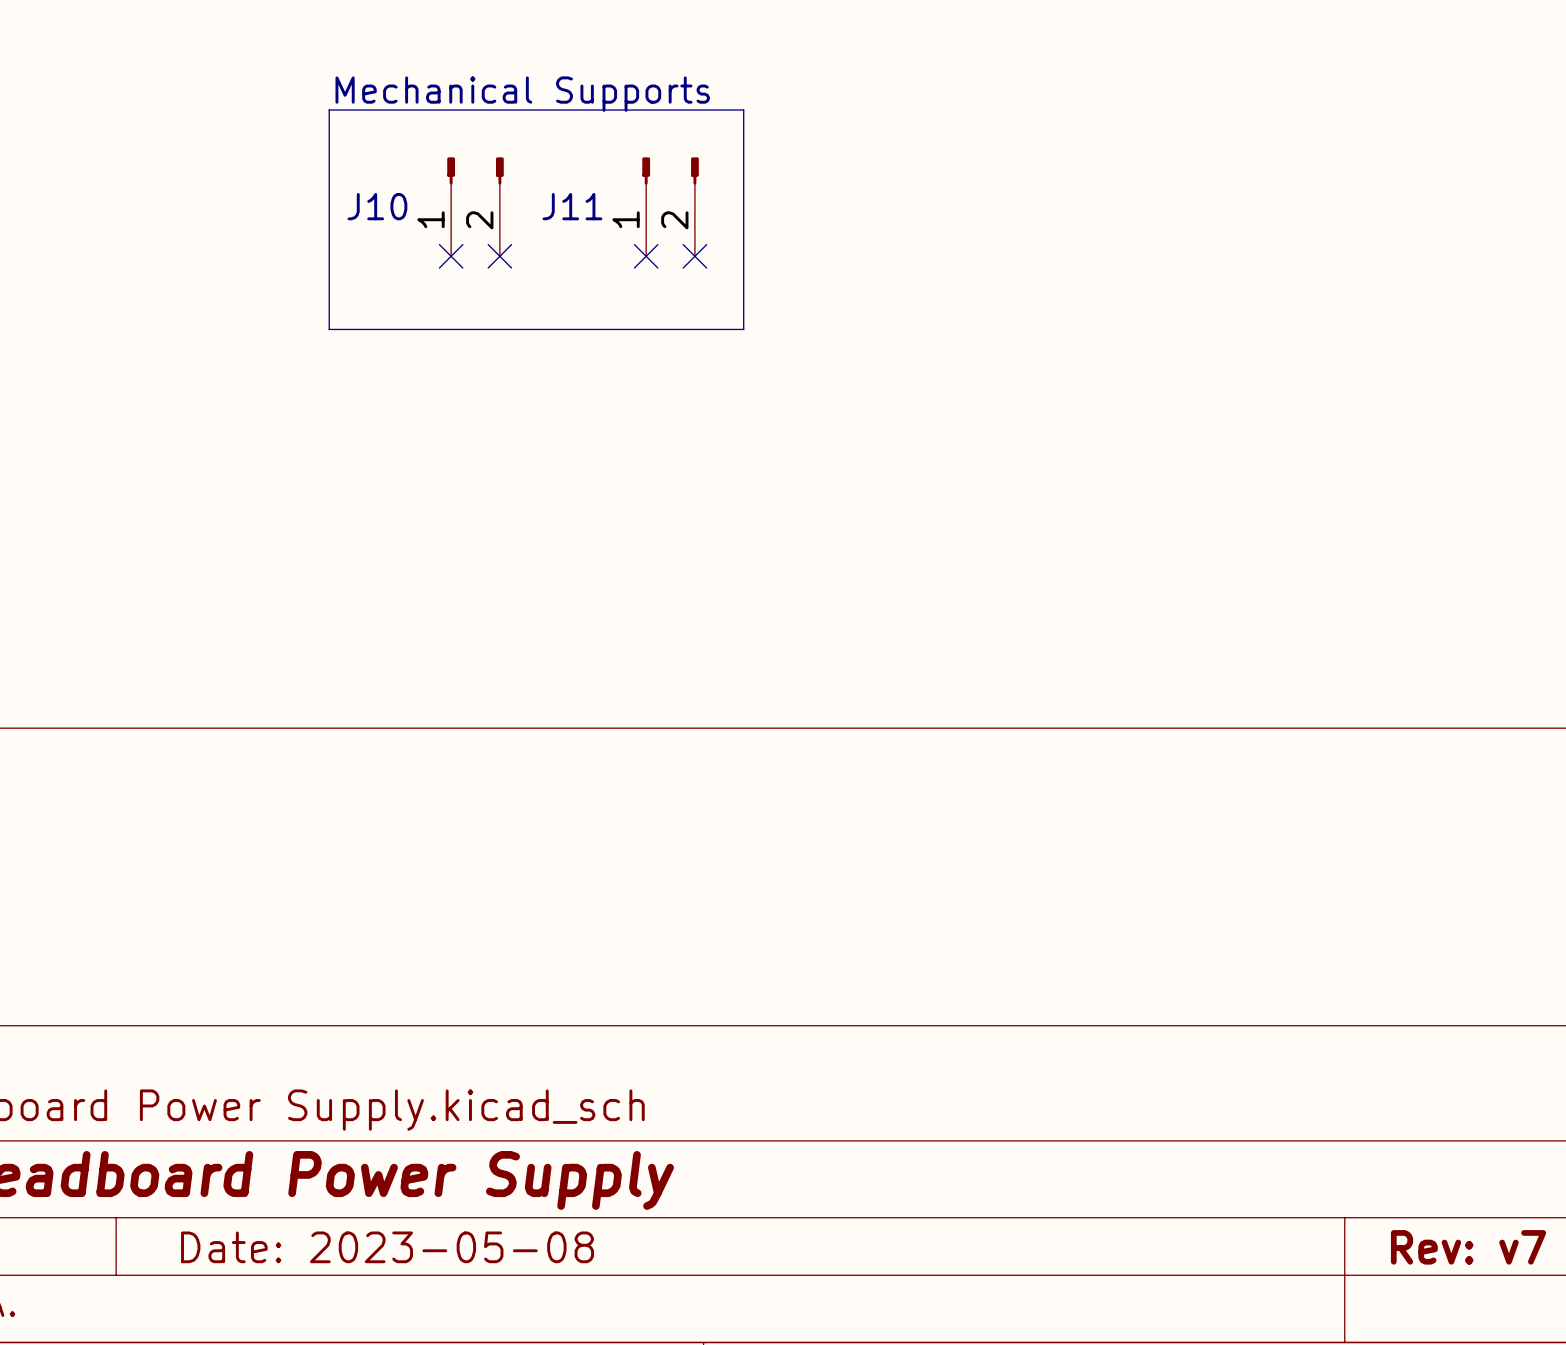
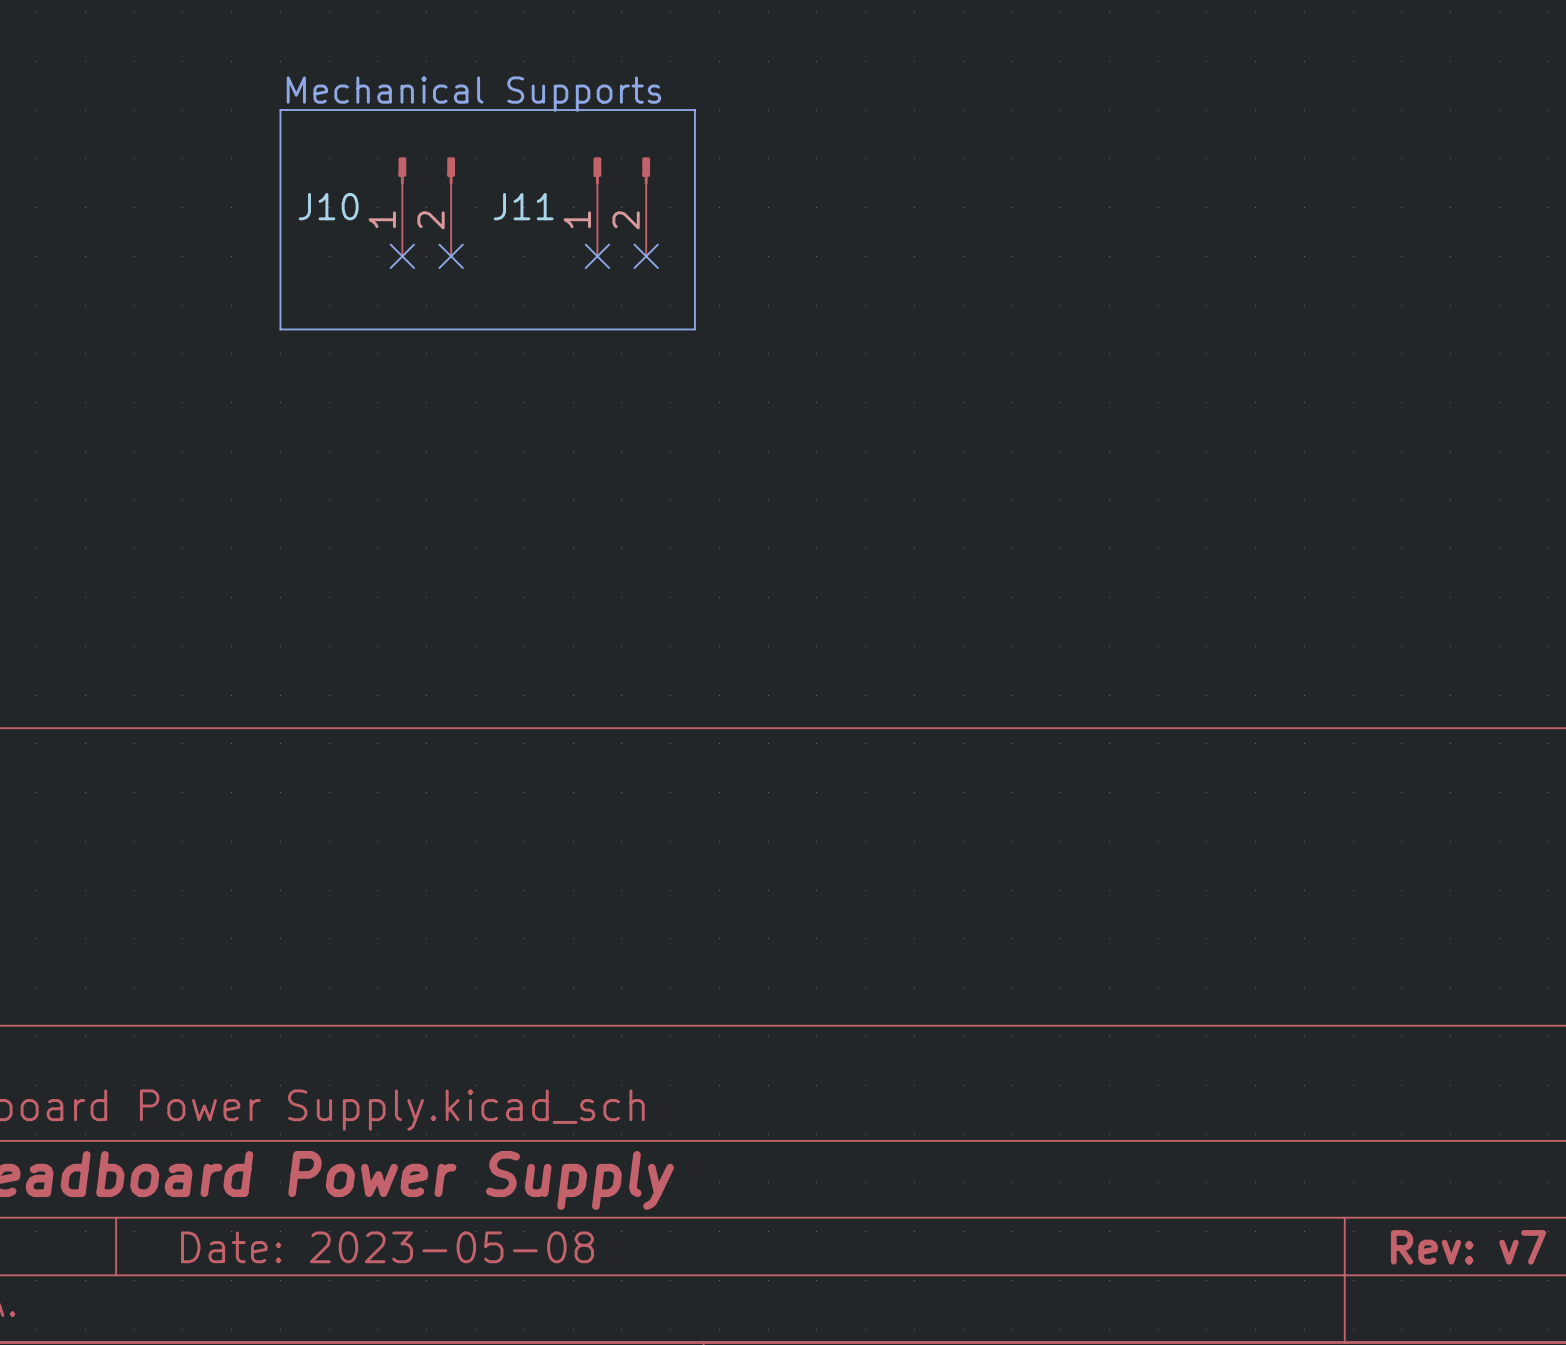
text position: Mechanical Supports (522, 94) -> Mechanical Supports (473, 94)
line: (329, 110) (329, 329) -> (329, 110) (280, 110) (280, 329) (329, 329)
line: (694, 110) (743, 110) (743, 329) (694, 329) -> (694, 110) (694, 329)
J10 position: (475, 206) -> (426, 206)
J11 position: (670, 206) -> (621, 206)
no-connect mark: none -> (402, 256)
no-connect mark: (499, 256) -> none
no-connect mark: none -> (597, 256)
no-connect mark: (694, 256) -> none

